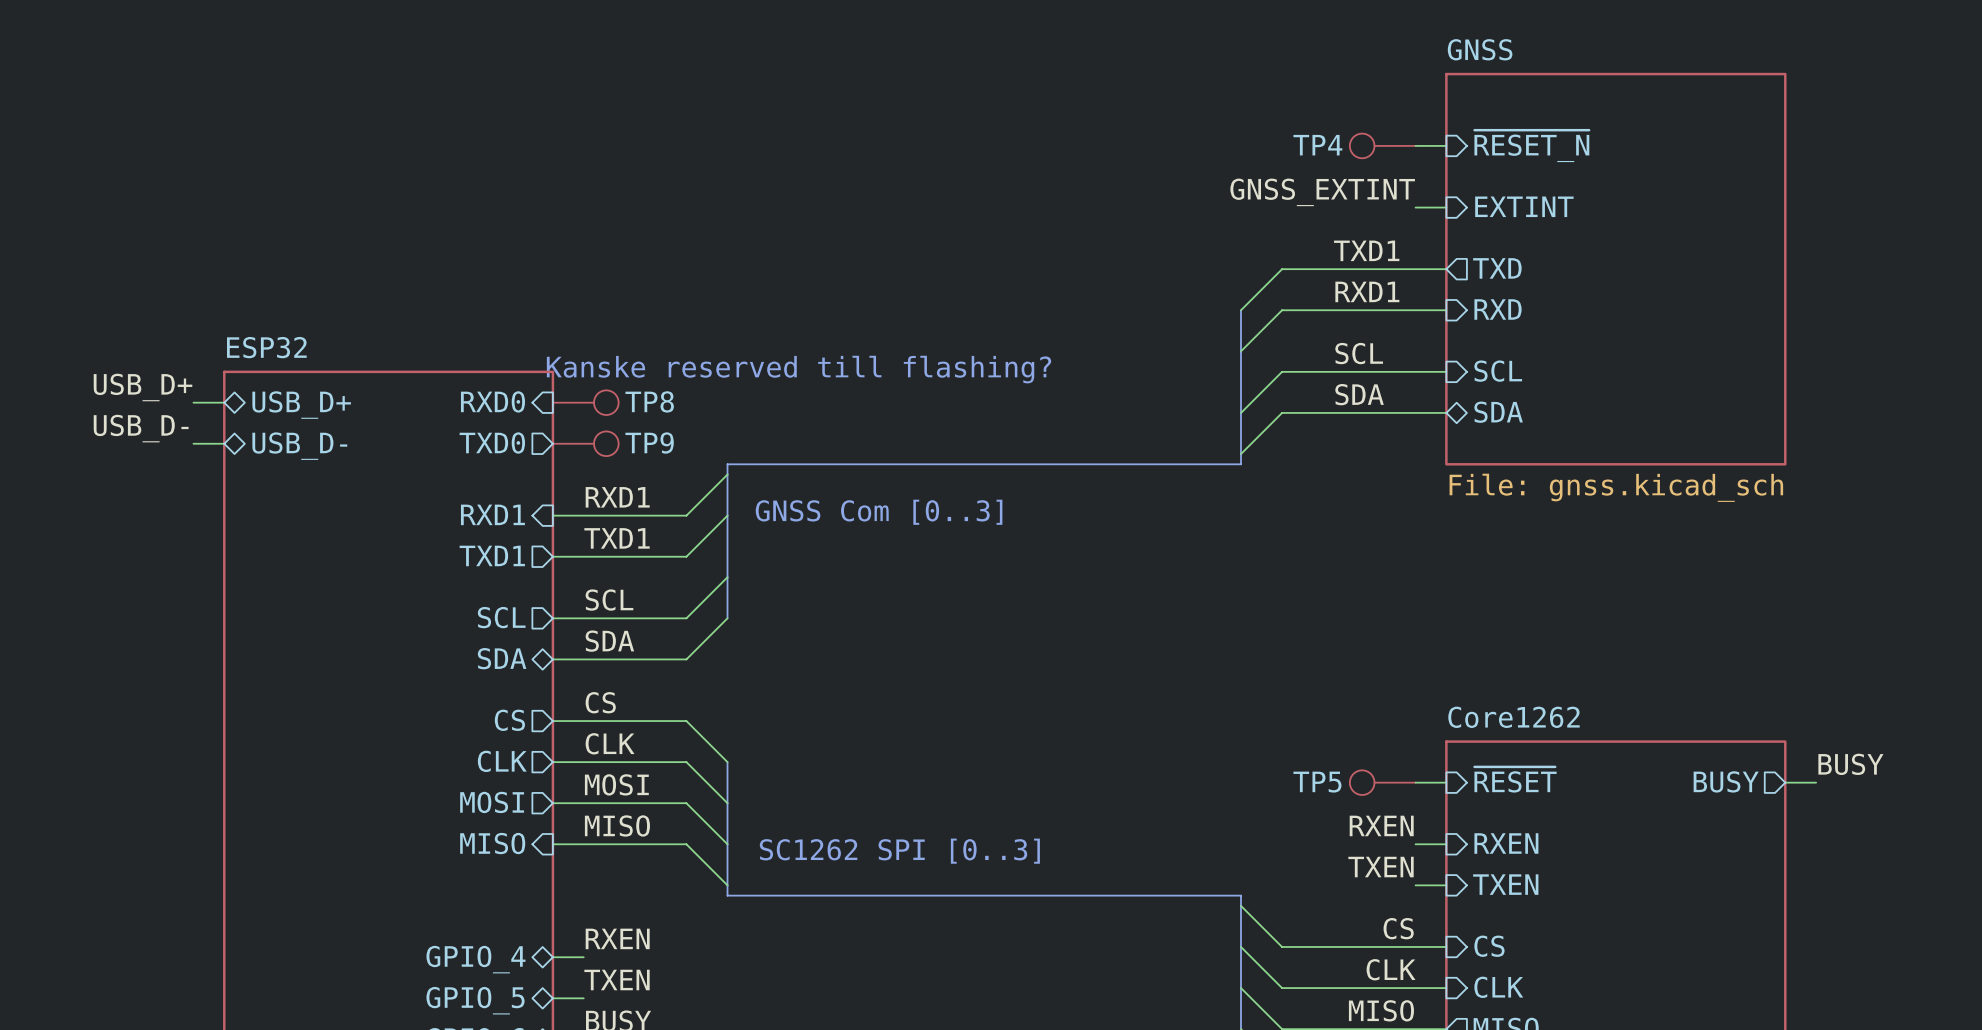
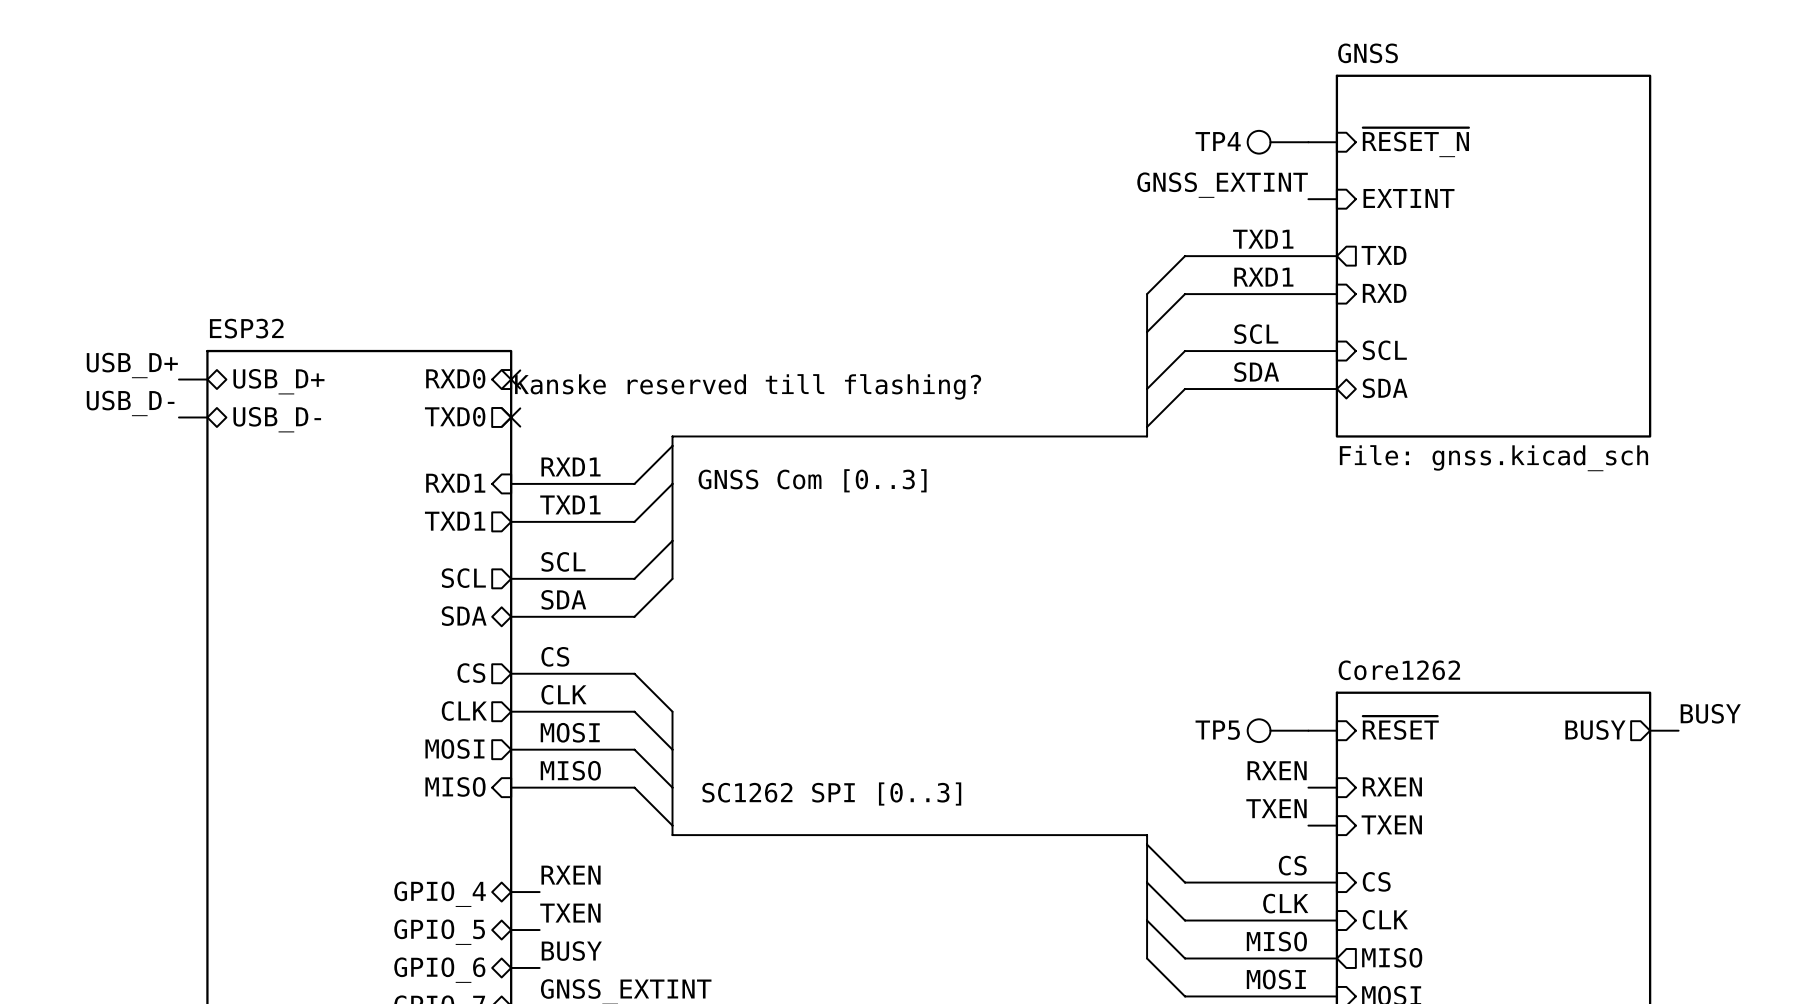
text position: Kanske reserved till flashing? (799, 369) -> Kanske reserved till flashing? (748, 386)
no-connect mark: none -> (511, 379)
TP8: (585, 402) -> none
no-connect mark: none -> (511, 417)
TP9: (585, 443) -> none

